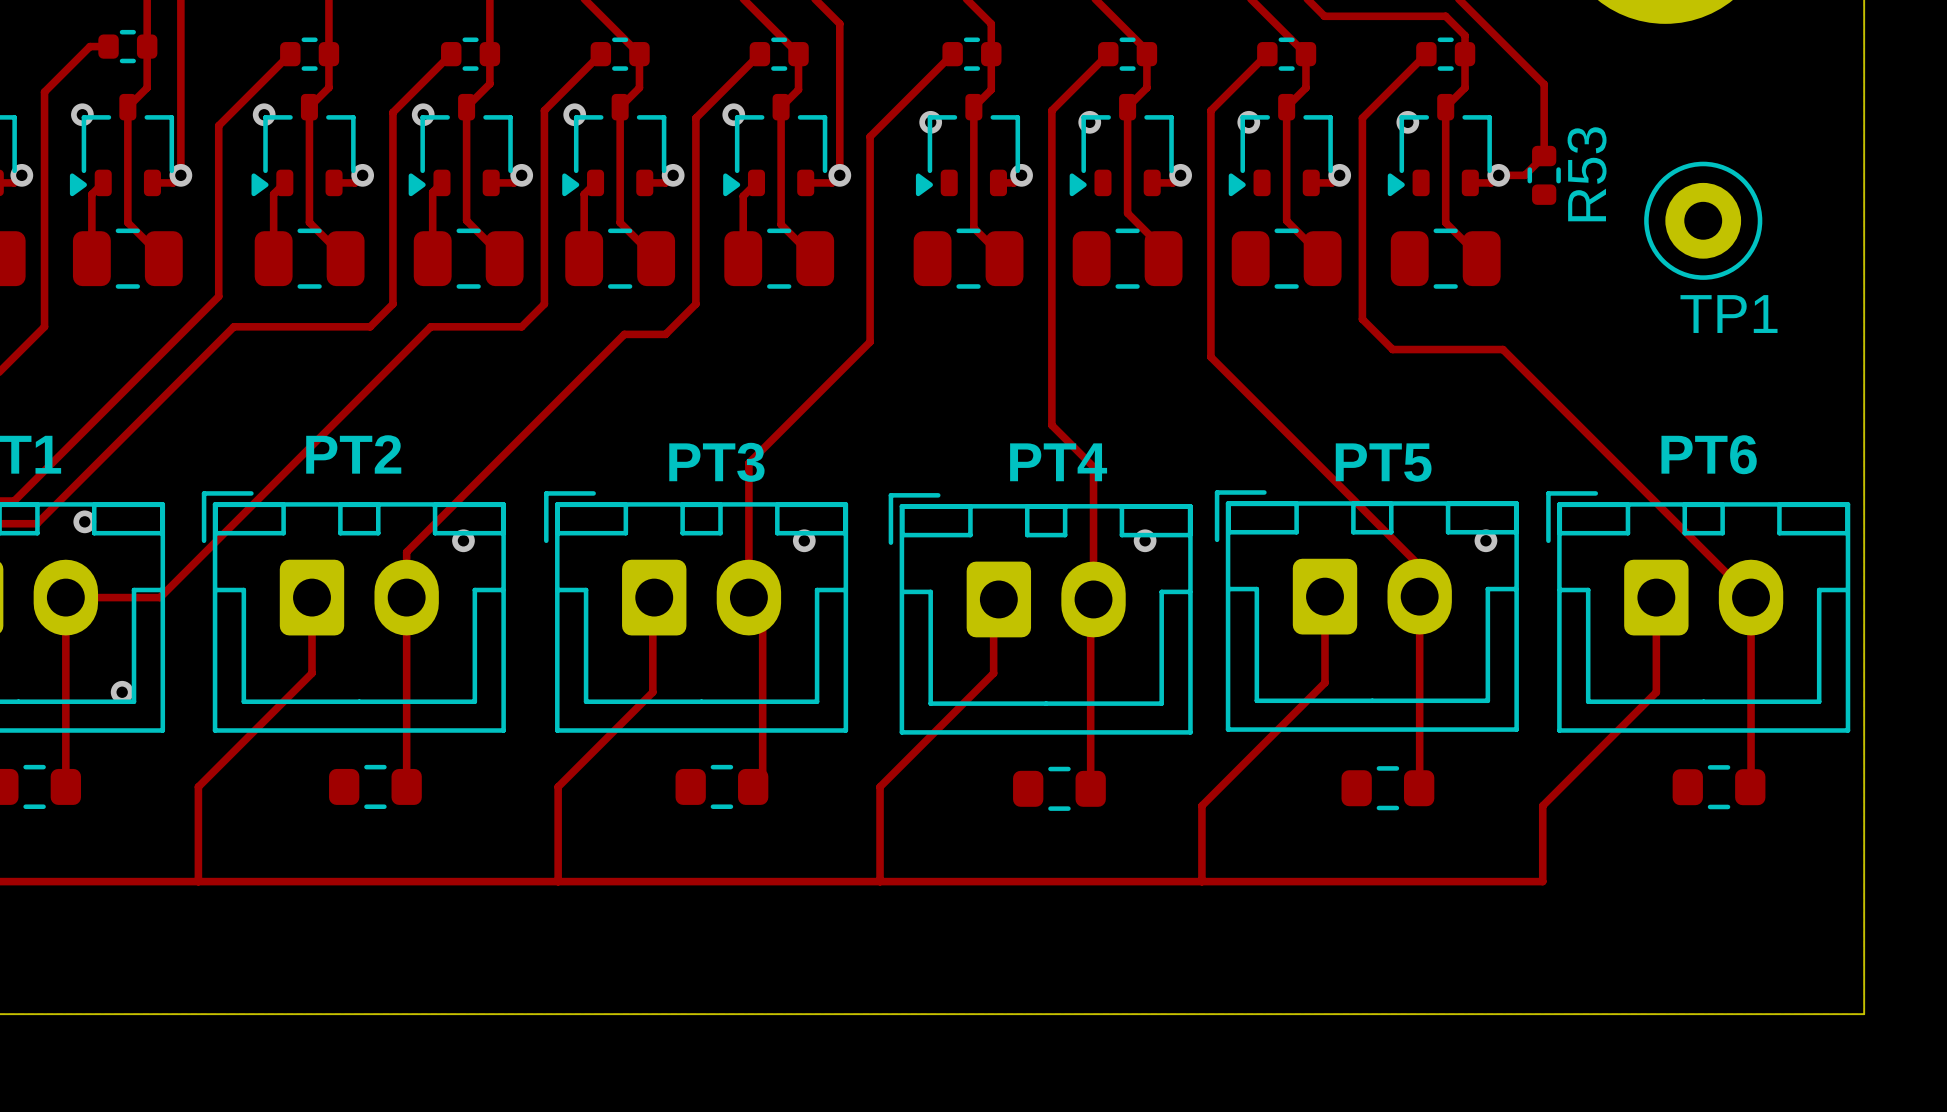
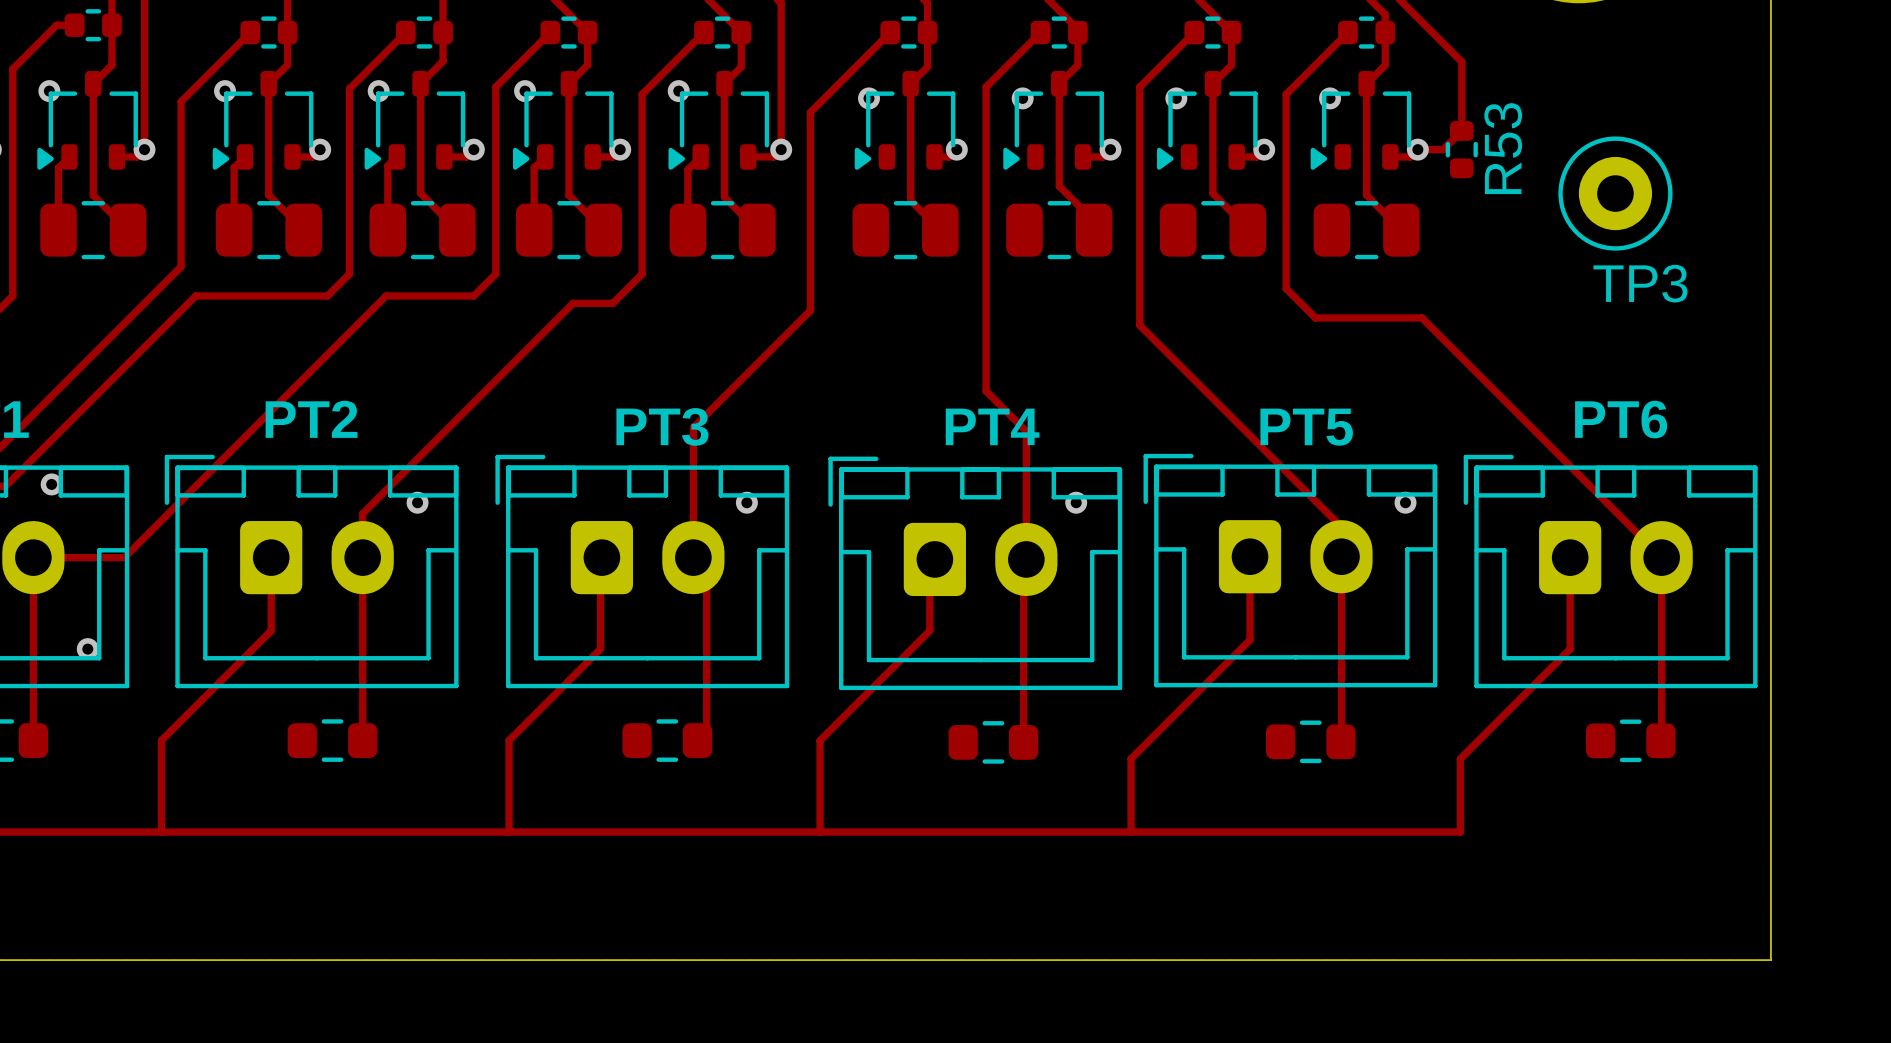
TP1 name: TP1 (1729, 314) -> TP3 (1640, 283)

